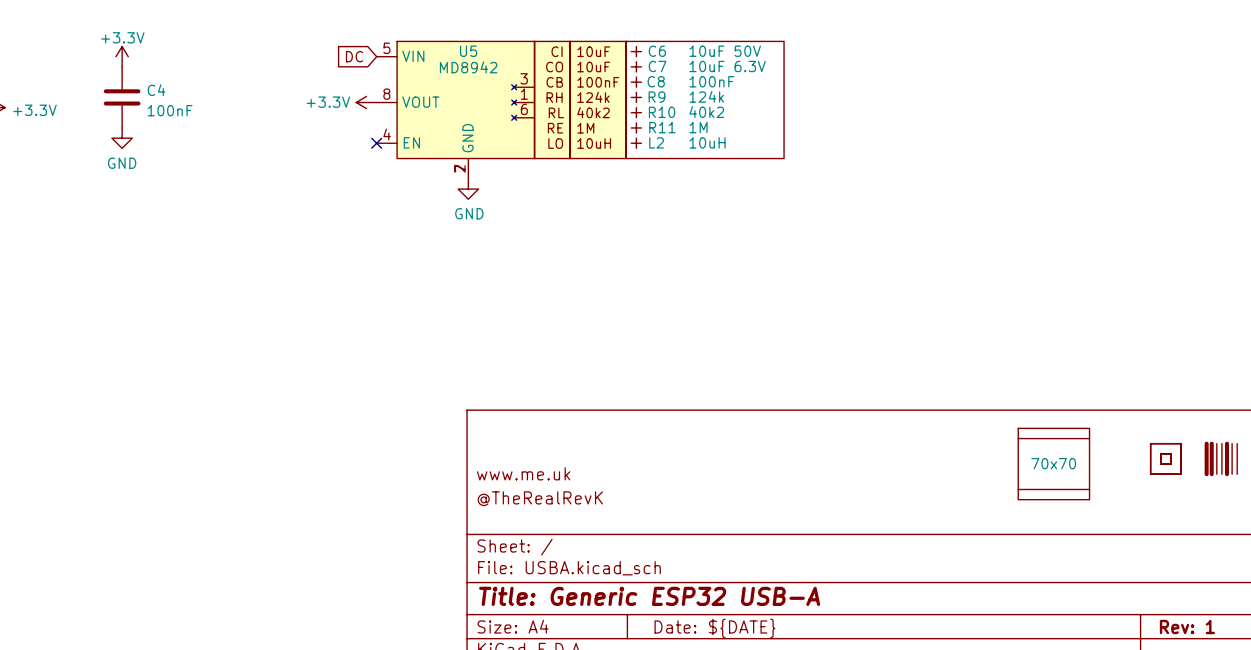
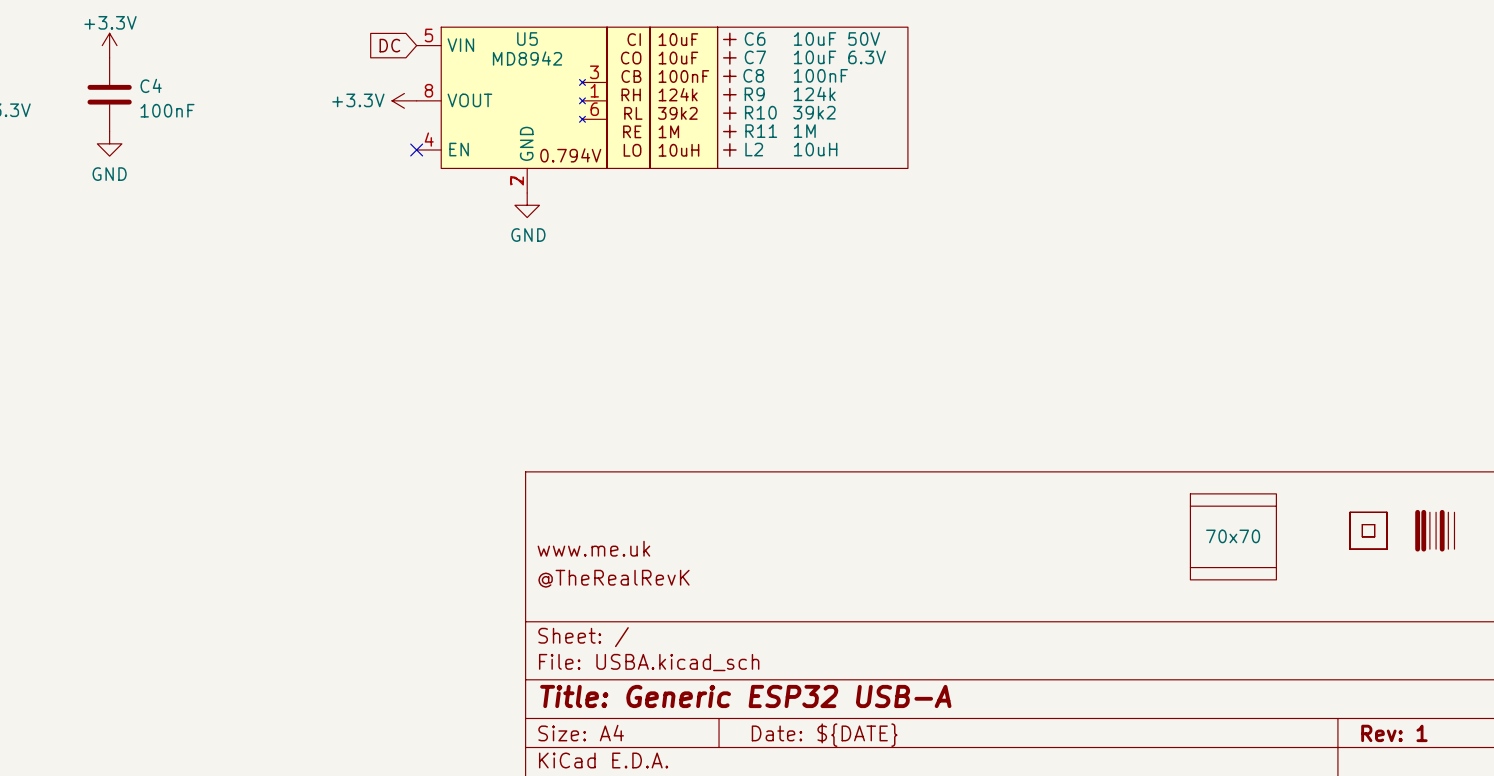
U5 text: 40k2 (593, 112) -> 39k2 (677, 113)
R10 value: 40k2 (706, 112) -> 39k2 (814, 112)
U5 text: none -> 0.794V (570, 155)

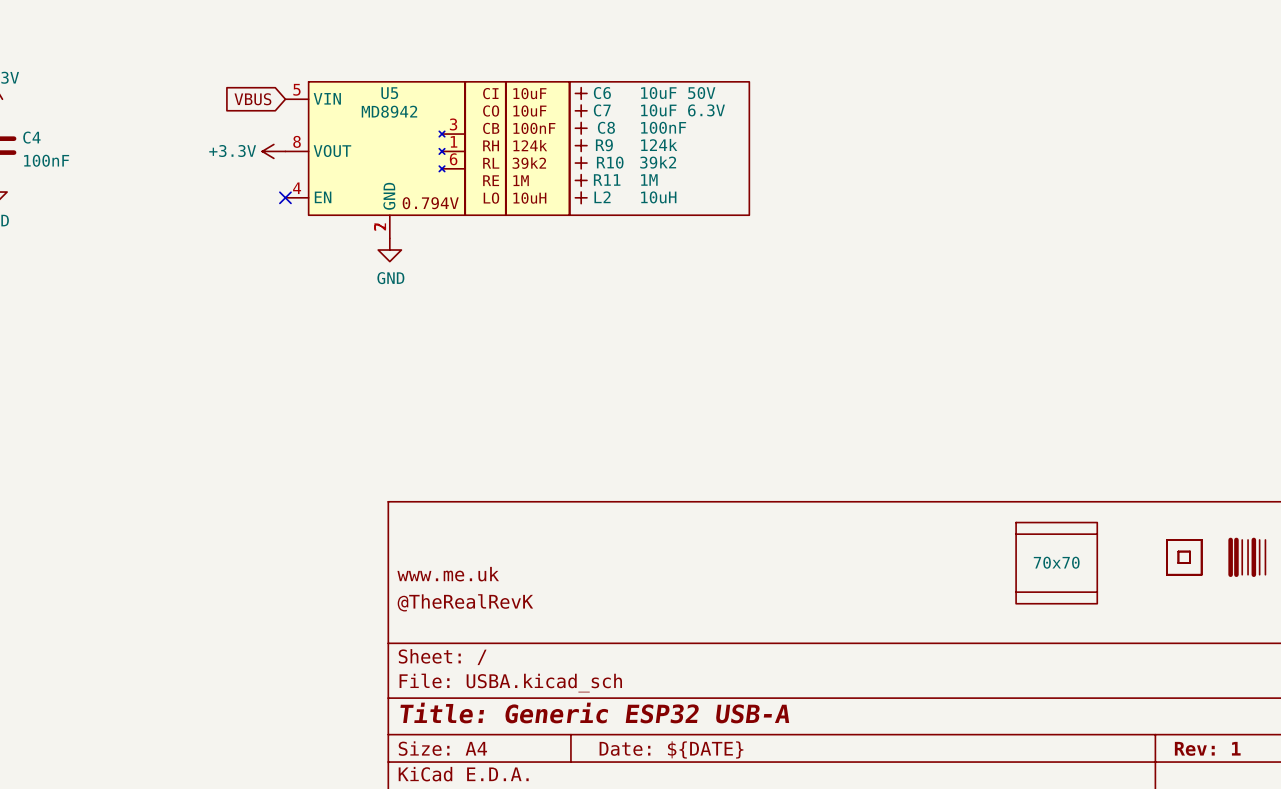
global label: DC (389, 45) -> VBUS (252, 99)

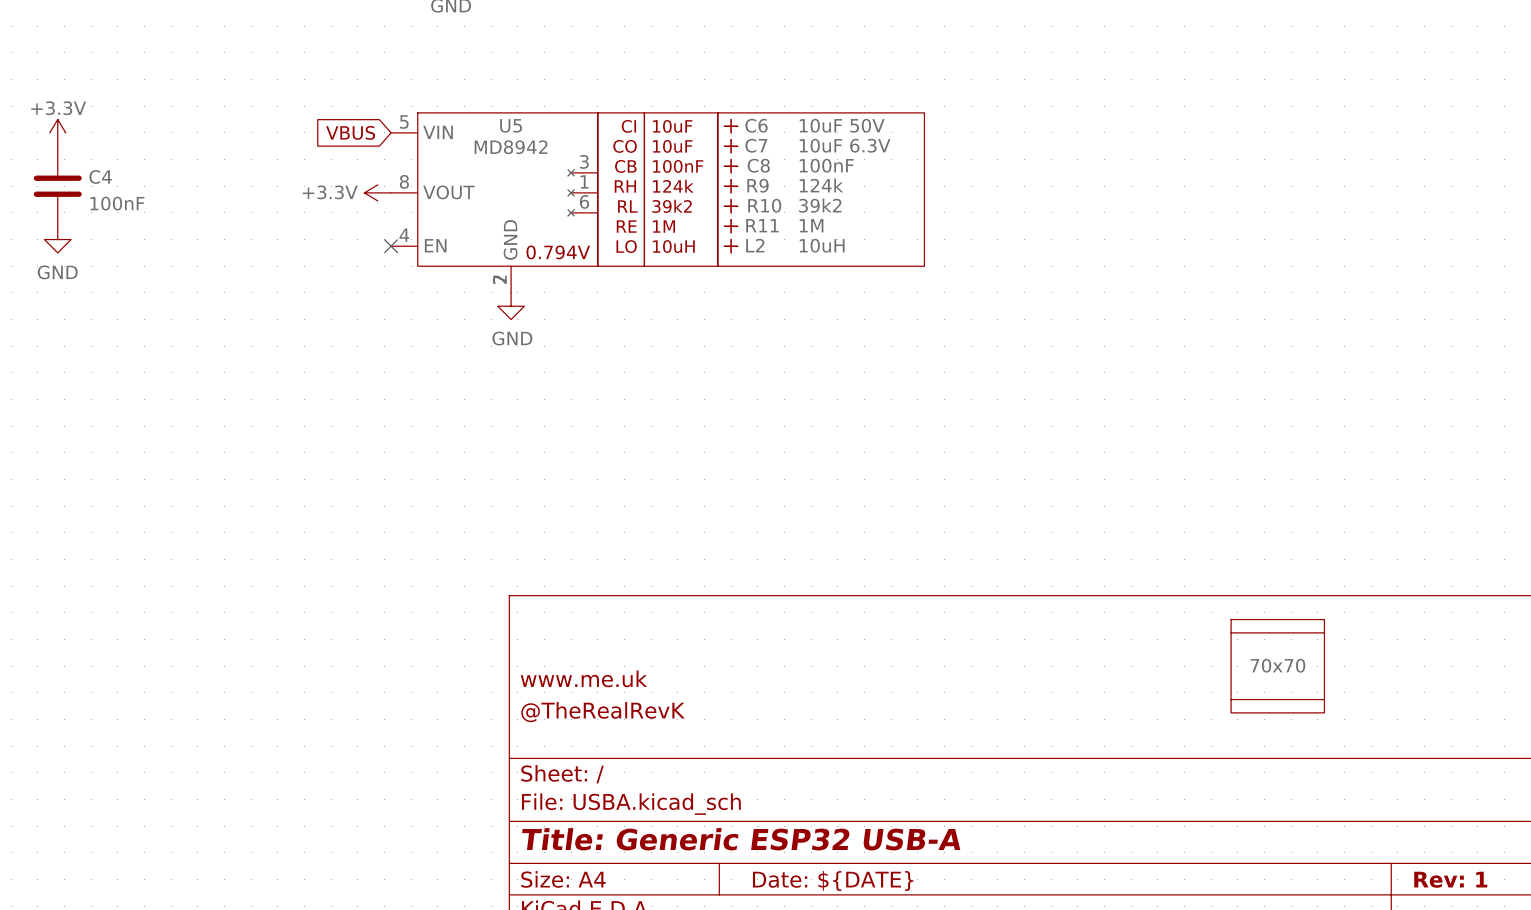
part: (1184, 557) -> none
part: (1246, 557) -> none

